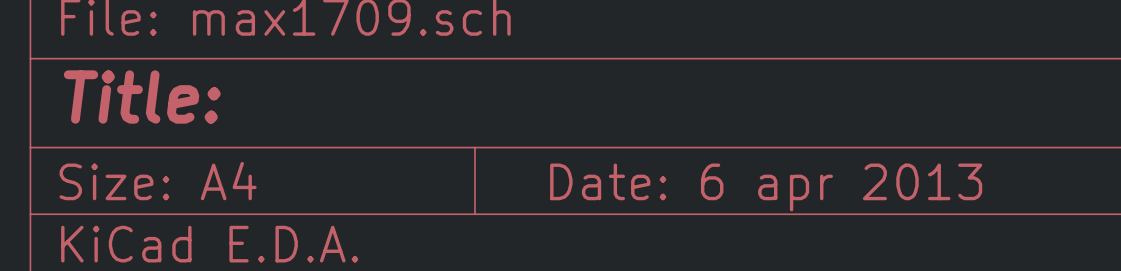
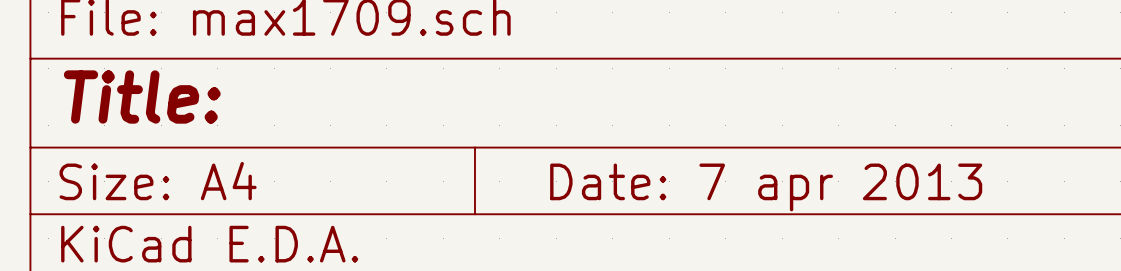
title block: Date: 6 apr 2013 (766, 187) -> Date: 7 apr 2013 (766, 187)

